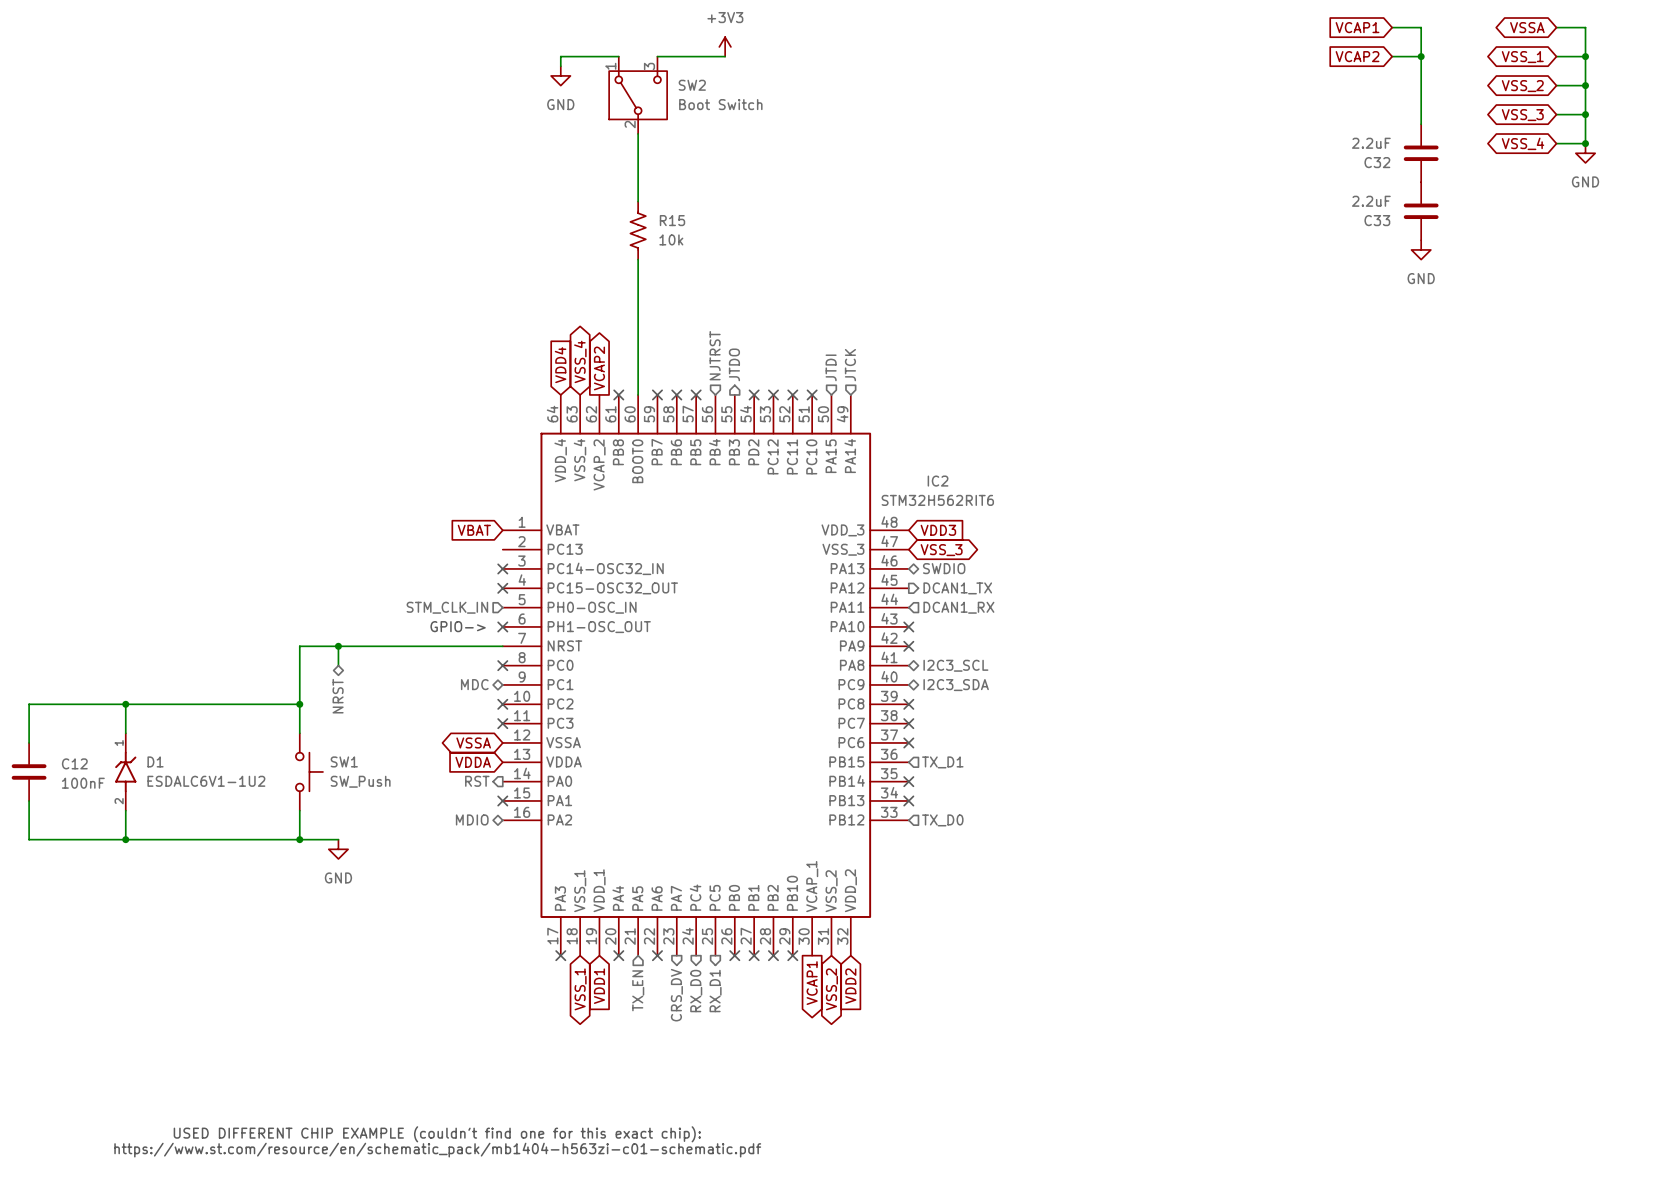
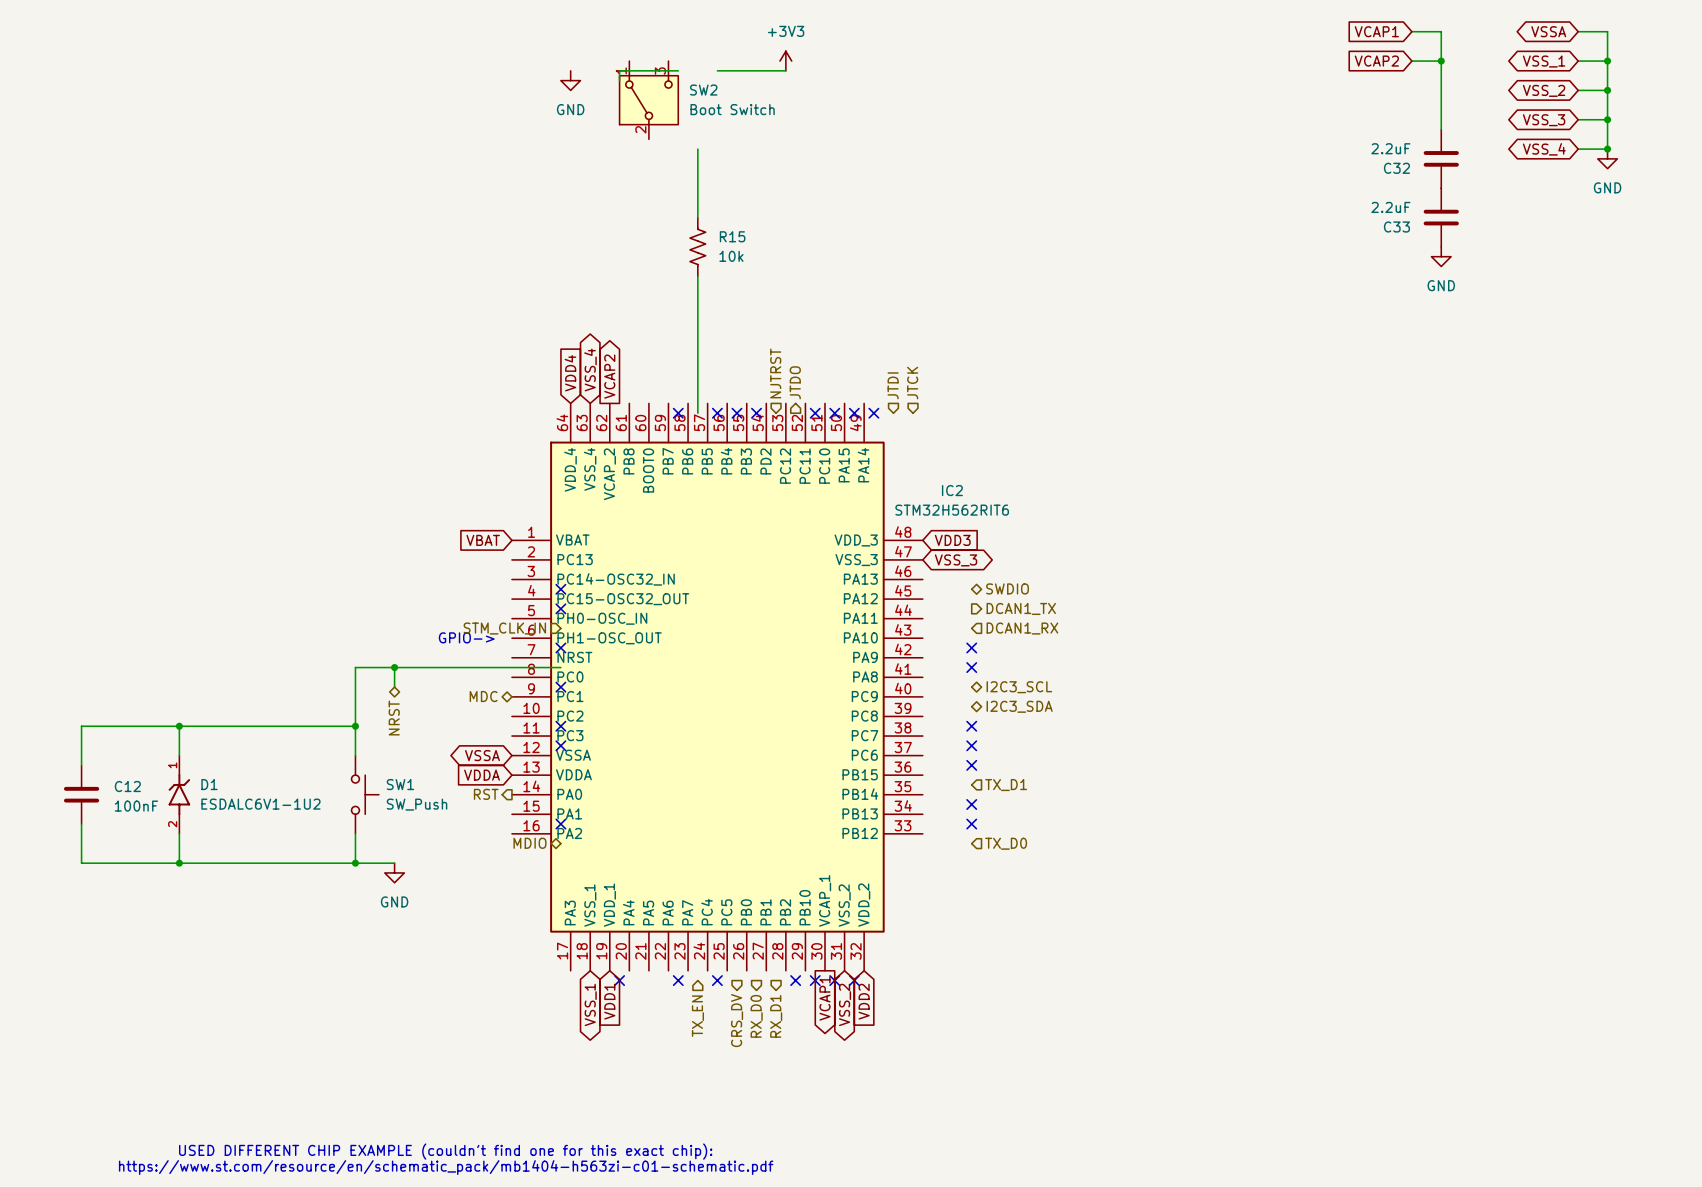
power symbol position: +3V3 (725, 46) -> +3V3 (785, 61)
wire: (618, 56) (560, 56) (560, 66) -> (678, 70) (619, 70) (619, 80)
wire: (657, 56) (725, 56) -> (717, 70) (785, 70)
wire: (638, 133) (638, 201) -> (697, 149) (697, 217)
R15 position: (638, 230) -> (697, 246)
wire: (638, 259) (638, 394) -> (697, 276) (697, 413)
hierarchical label position: NJTRST (715, 355) -> NJTRST (775, 373)
hierarchical label position: JTDO (734, 364) -> JTDO (795, 382)
hierarchical label position: JTCK (850, 365) -> JTCK (912, 383)
hierarchical label position: JTDI (831, 367) -> JTDI (893, 385)
no-connect mark: (618, 394) -> none
no-connect mark: (657, 394) -> none
no-connect mark: (676, 394) -> none
no-connect mark position: (696, 394) -> (717, 413)
no-connect mark position: (754, 394) -> (756, 413)
no-connect mark: (773, 394) -> none
no-connect mark: (792, 394) -> none
no-connect mark: (812, 394) -> none
no-connect mark: none -> (678, 413)
no-connect mark: none -> (736, 413)
no-connect mark: none -> (815, 413)
no-connect mark: none -> (834, 413)
no-connect mark: none -> (854, 413)
no-connect mark: none -> (873, 413)
no-connect mark: (502, 568) -> none
hierarchical label position: SWDIO (944, 568) -> SWDIO (1007, 588)
no-connect mark: none -> (560, 589)
no-connect mark: (502, 588) -> none
hierarchical label position: DCAN1_TX (957, 588) -> DCAN1_TX (1021, 608)
no-connect mark: none -> (560, 608)
hierarchical label position: STM_CLK_IN (447, 607) -> STM_CLK_IN (504, 628)
hierarchical label position: DCAN1_RX (958, 607) -> DCAN1_RX (1022, 628)
no-connect mark: (502, 626) -> none
no-connect mark: (908, 626) -> none
no-connect mark: none -> (560, 647)
no-connect mark: none -> (971, 647)
wire: (338, 646) (338, 665) -> (394, 667) (394, 687)
junction: (338, 646) -> none
wire: (502, 646) (299, 646) (299, 733) -> (560, 667) (355, 667) (355, 755)
no-connect mark: (908, 646) -> none
junction: none -> (394, 667)
no-connect mark: none -> (971, 667)
no-connect mark: (502, 665) -> none
hierarchical label position: I2C3_SCL (955, 665) -> I2C3_SCL (1019, 687)
no-connect mark: none -> (560, 687)
hierarchical label position: I2C3_SDA (956, 685) -> I2C3_SDA (1019, 706)
hierarchical label position: NRST (338, 696) -> NRST (394, 718)
wire: (125, 704) (125, 733) -> (179, 726) (179, 755)
junction: (125, 704) -> none
wire: (299, 704) (29, 704) (29, 742) -> (355, 726) (81, 726) (81, 765)
junction: (299, 704) -> none
no-connect mark: (502, 704) -> none
no-connect mark: (908, 704) -> none
junction: none -> (179, 726)
junction: none -> (355, 726)
no-connect mark: none -> (560, 726)
no-connect mark: none -> (971, 726)
no-connect mark: (502, 723) -> none
no-connect mark: (908, 723) -> none
no-connect mark: none -> (560, 745)
no-connect mark: none -> (971, 745)
no-connect mark: (908, 742) -> none
no-connect mark: none -> (971, 765)
hierarchical label position: TX_D1 (942, 762) -> TX_D1 (1006, 785)
C12 position: (29, 771) -> (81, 794)
D1 position: (125, 771) -> (179, 794)
SW1 position: (309, 771) -> (365, 794)
no-connect mark: (908, 781) -> none
no-connect mark: none -> (971, 804)
wire: (29, 800) (29, 839) (338, 839) -> (81, 824) (81, 863) (394, 863)
no-connect mark: (502, 800) -> none
no-connect mark: (908, 800) -> none
wire: (125, 810) (125, 839) -> (179, 833) (179, 863)
wire: (299, 810) (299, 839) -> (355, 833) (355, 863)
no-connect mark: none -> (560, 824)
no-connect mark: none -> (971, 824)
hierarchical label position: MDIO (472, 819) -> MDIO (529, 843)
hierarchical label position: TX_D0 (942, 820) -> TX_D0 (1006, 843)
junction: (125, 839) -> none
junction: (299, 839) -> none
junction: none -> (179, 863)
power symbol position: GND (338, 849) -> GND (394, 872)
junction: none -> (355, 863)
no-connect mark: (560, 955) -> none
no-connect mark position: (618, 955) -> (619, 980)
no-connect mark position: (657, 955) -> (678, 980)
no-connect mark: (734, 955) -> none
no-connect mark: (754, 955) -> none
no-connect mark: (773, 955) -> none
no-connect mark: (792, 955) -> none
no-connect mark: none -> (717, 980)
no-connect mark: none -> (795, 980)
no-connect mark: none -> (815, 980)
no-connect mark: none -> (834, 980)
no-connect mark: none -> (854, 980)
hierarchical label position: TX_EN (638, 990) -> TX_EN (697, 1016)
hierarchical label position: RX_D0 (696, 991) -> RX_D0 (756, 1016)
hierarchical label position: RX_D1 (715, 991) -> RX_D1 (776, 1016)
hierarchical label position: CRS_DV (676, 995) -> CRS_DV (737, 1020)

